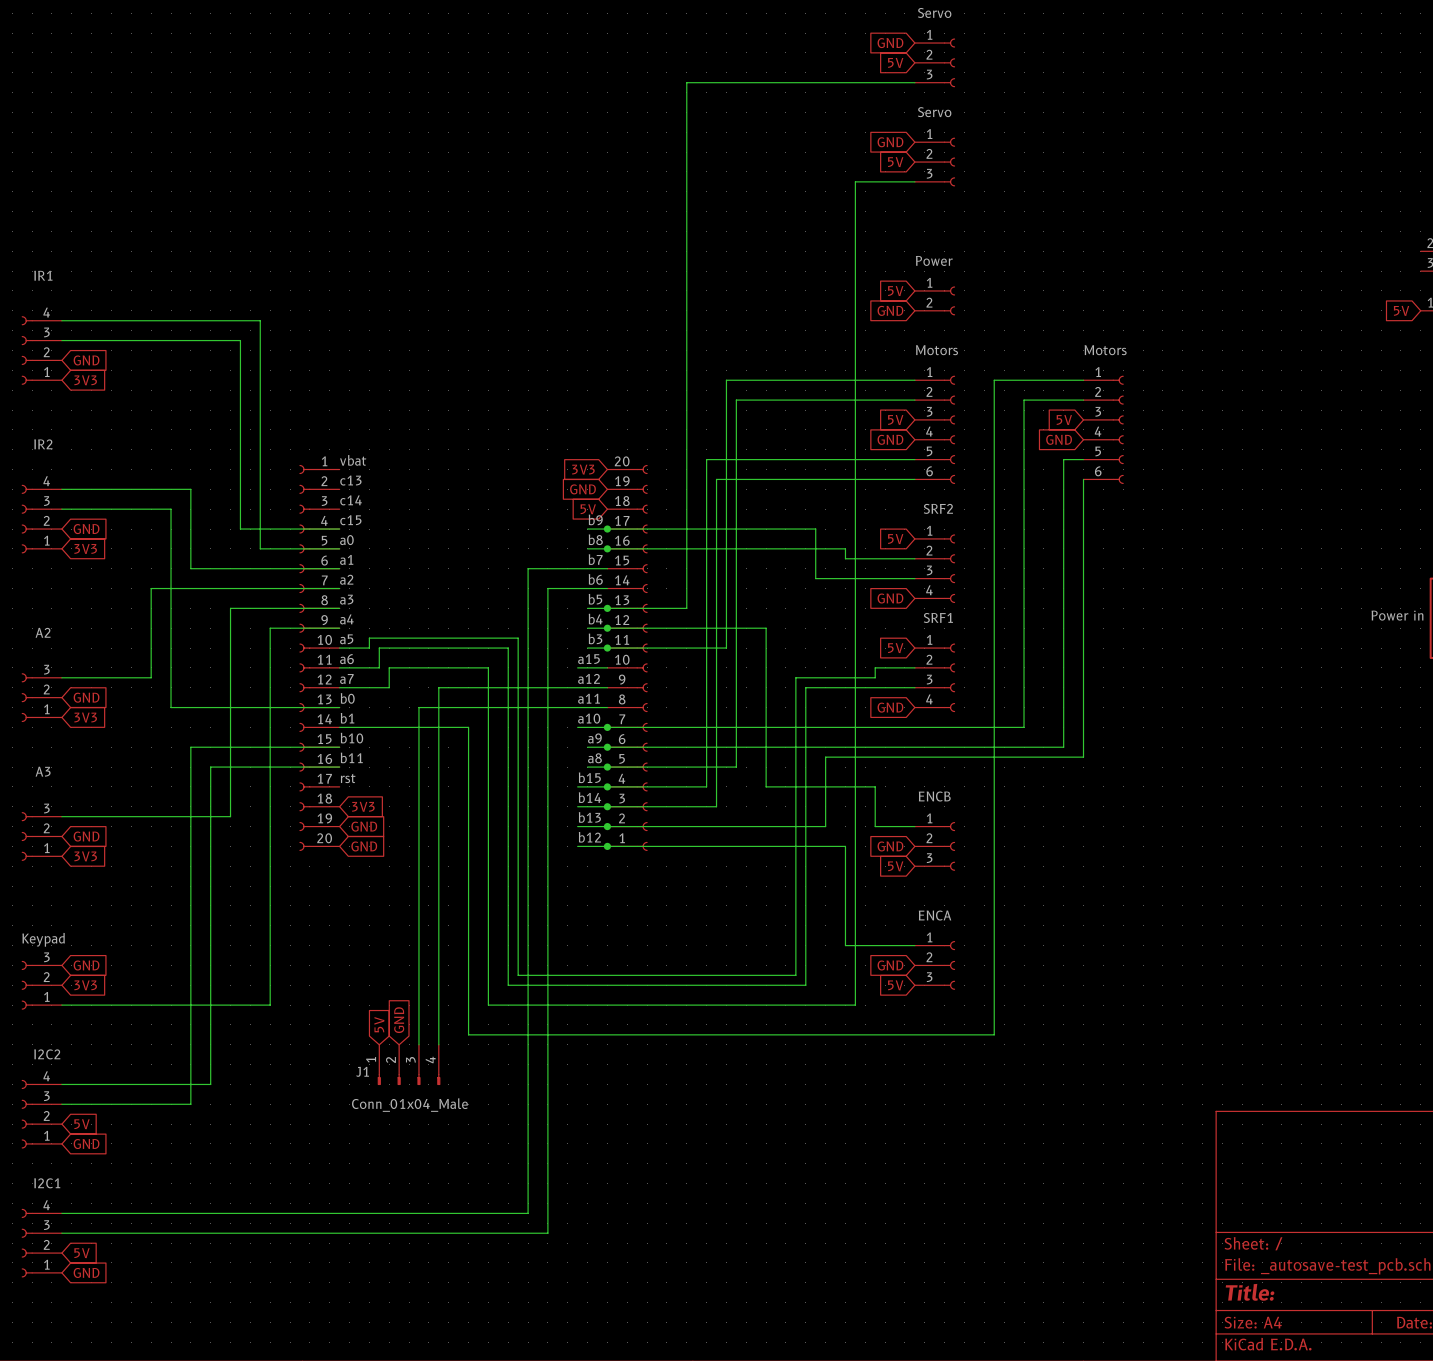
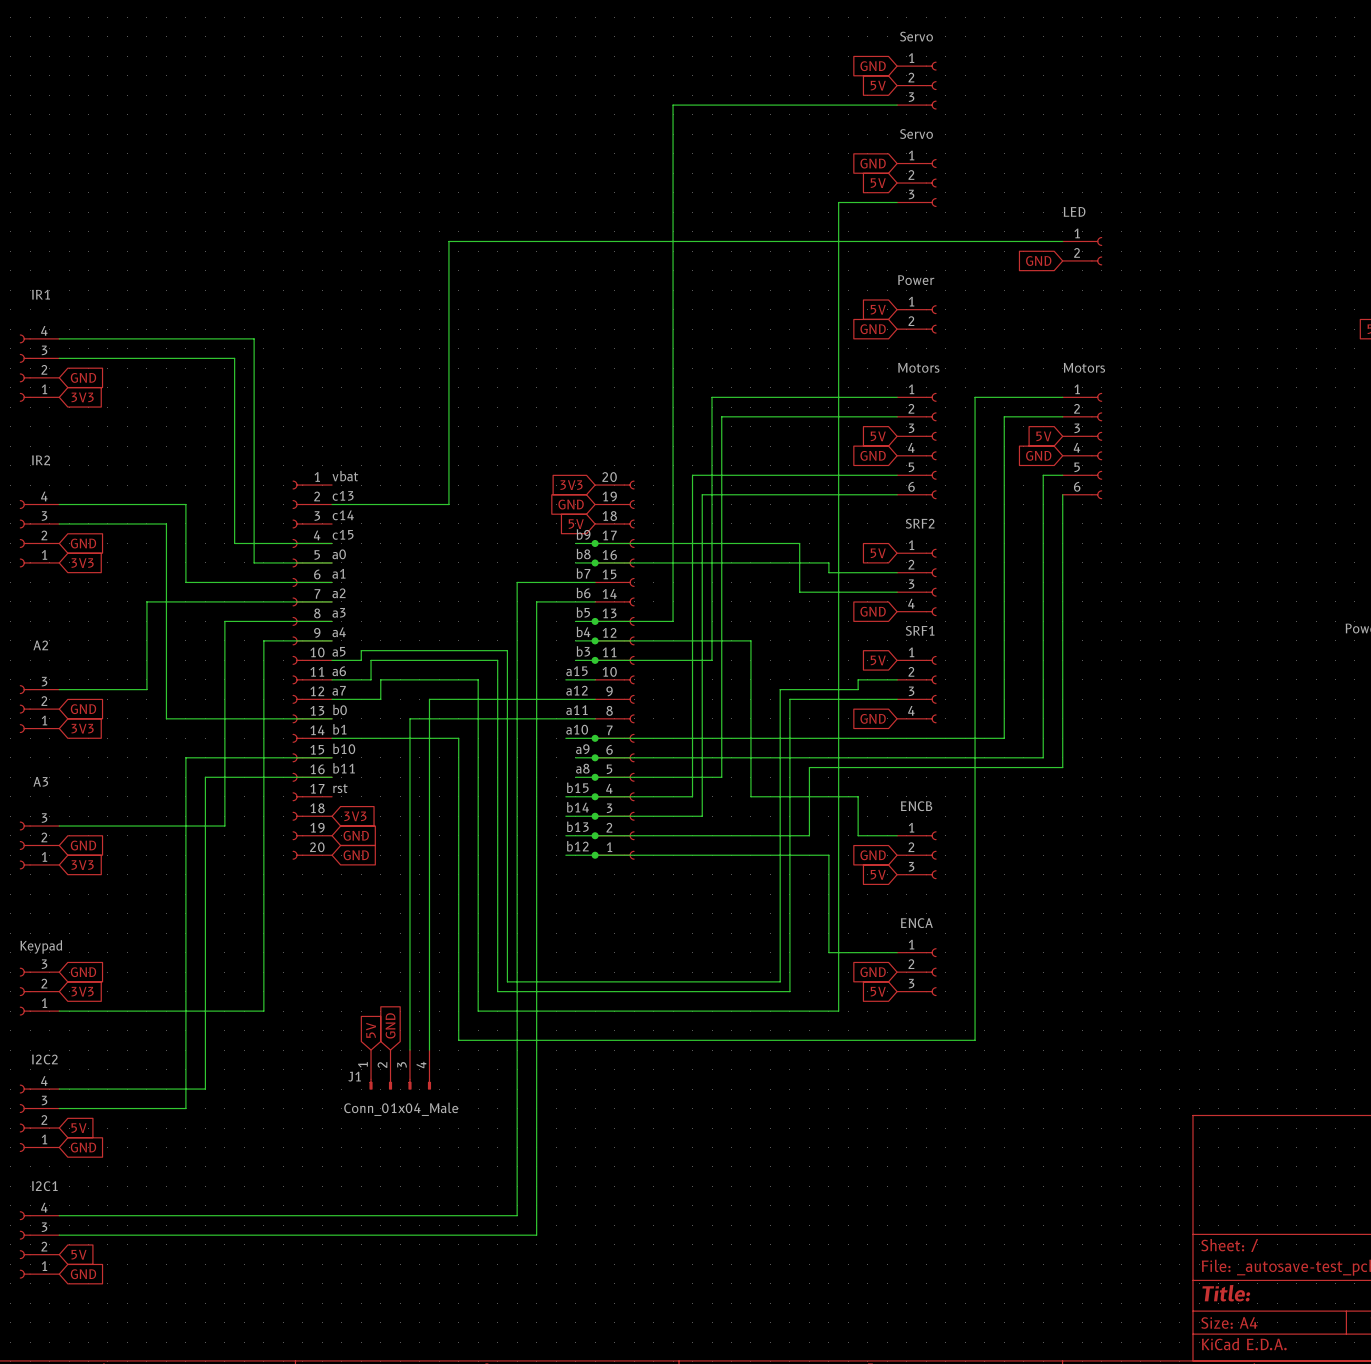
wire: none -> (1062, 241) (448, 241) (448, 504) (332, 504)
part: none -> LED (1082, 251)
global label: none -> GND (1038, 261)

